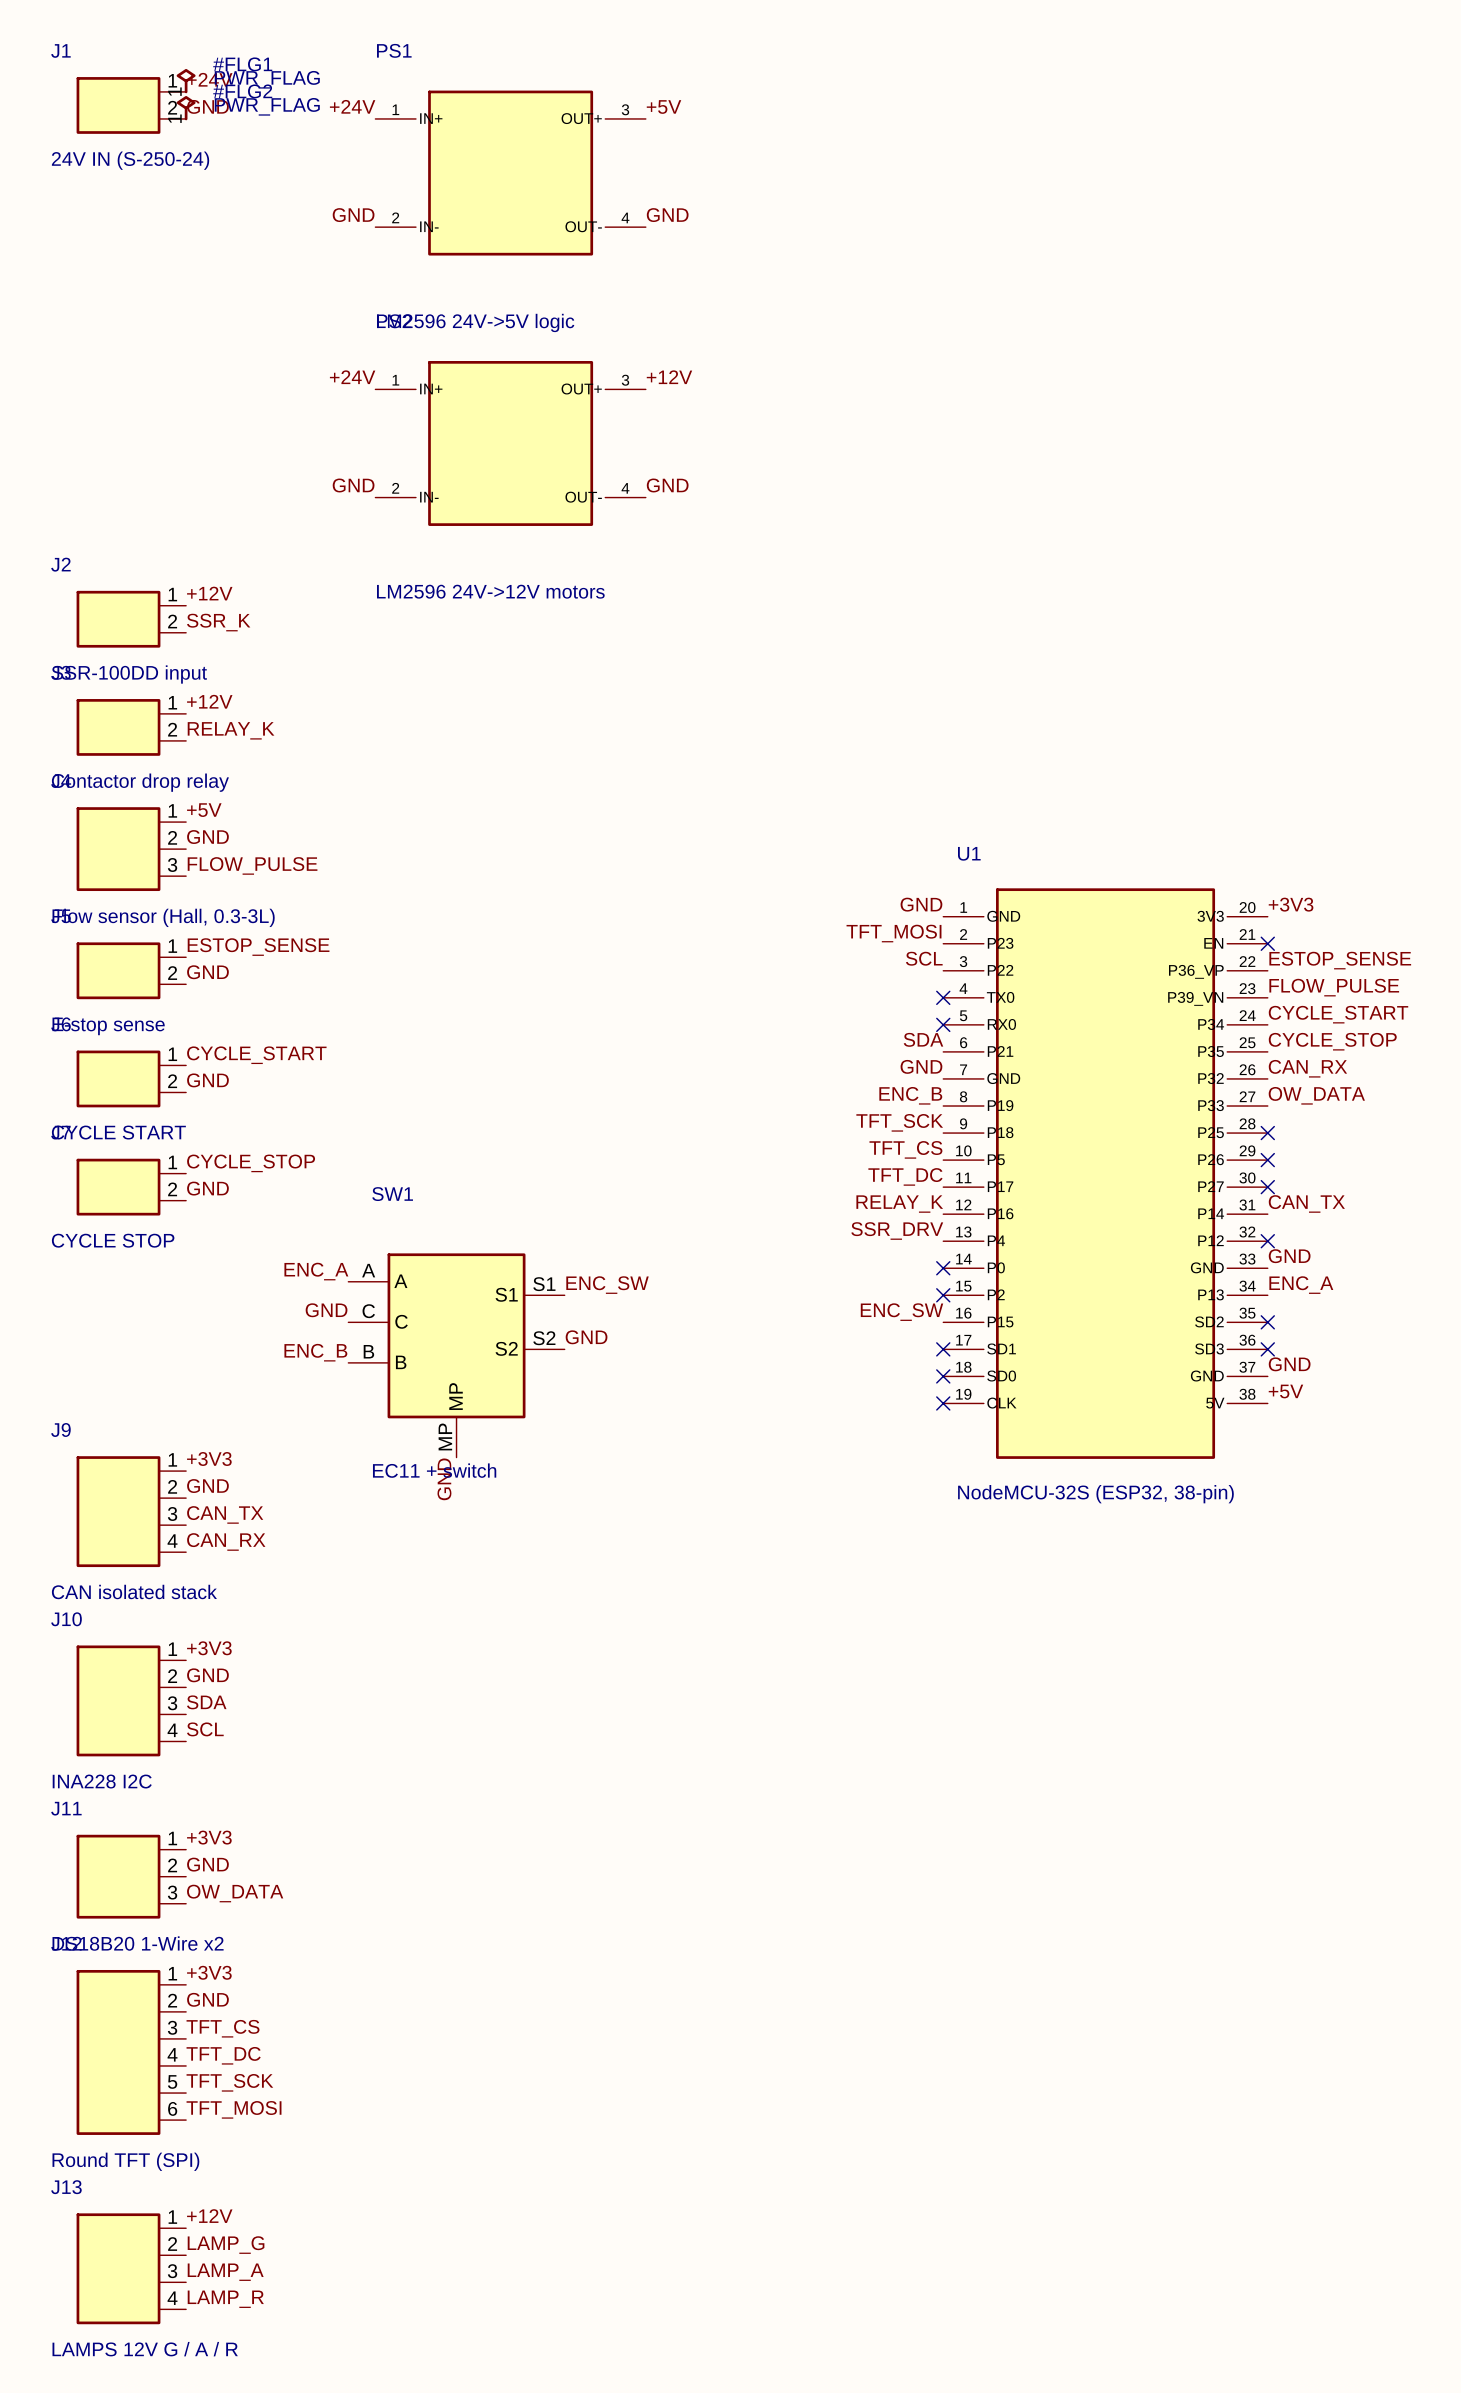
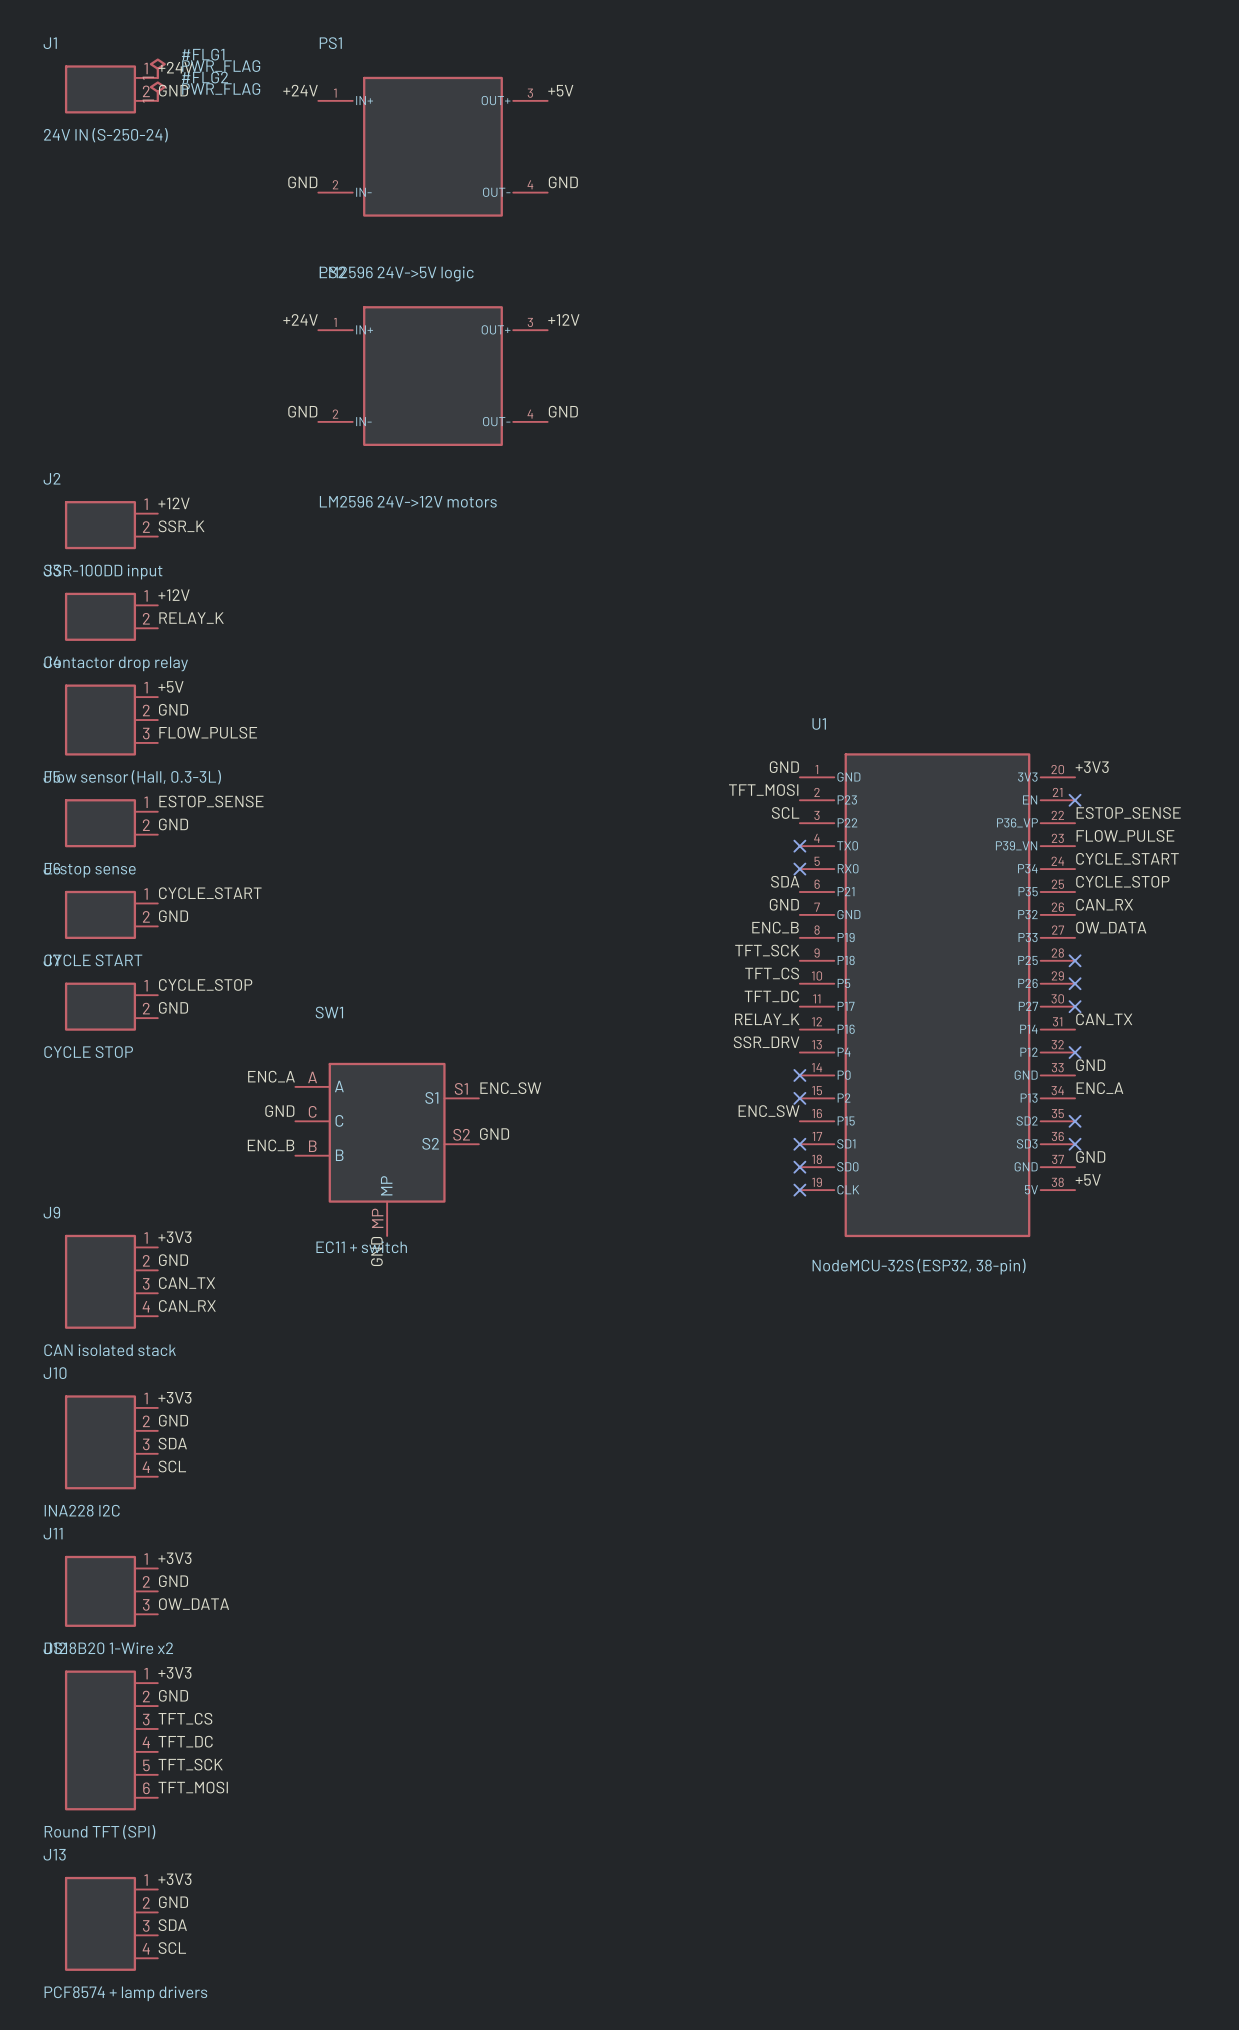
label: +12V (209, 2216) -> +3V3 (174, 1879)
label: LAMP_G (226, 2245) -> GND (173, 1902)
label: LAMP_A (225, 2272) -> SDA (172, 1925)
label: LAMP_R (225, 2299) -> SCL (172, 1948)
J13 value: LAMPS 12V G / A / R (145, 2349) -> PCF8574 + lamp drivers (125, 1993)

